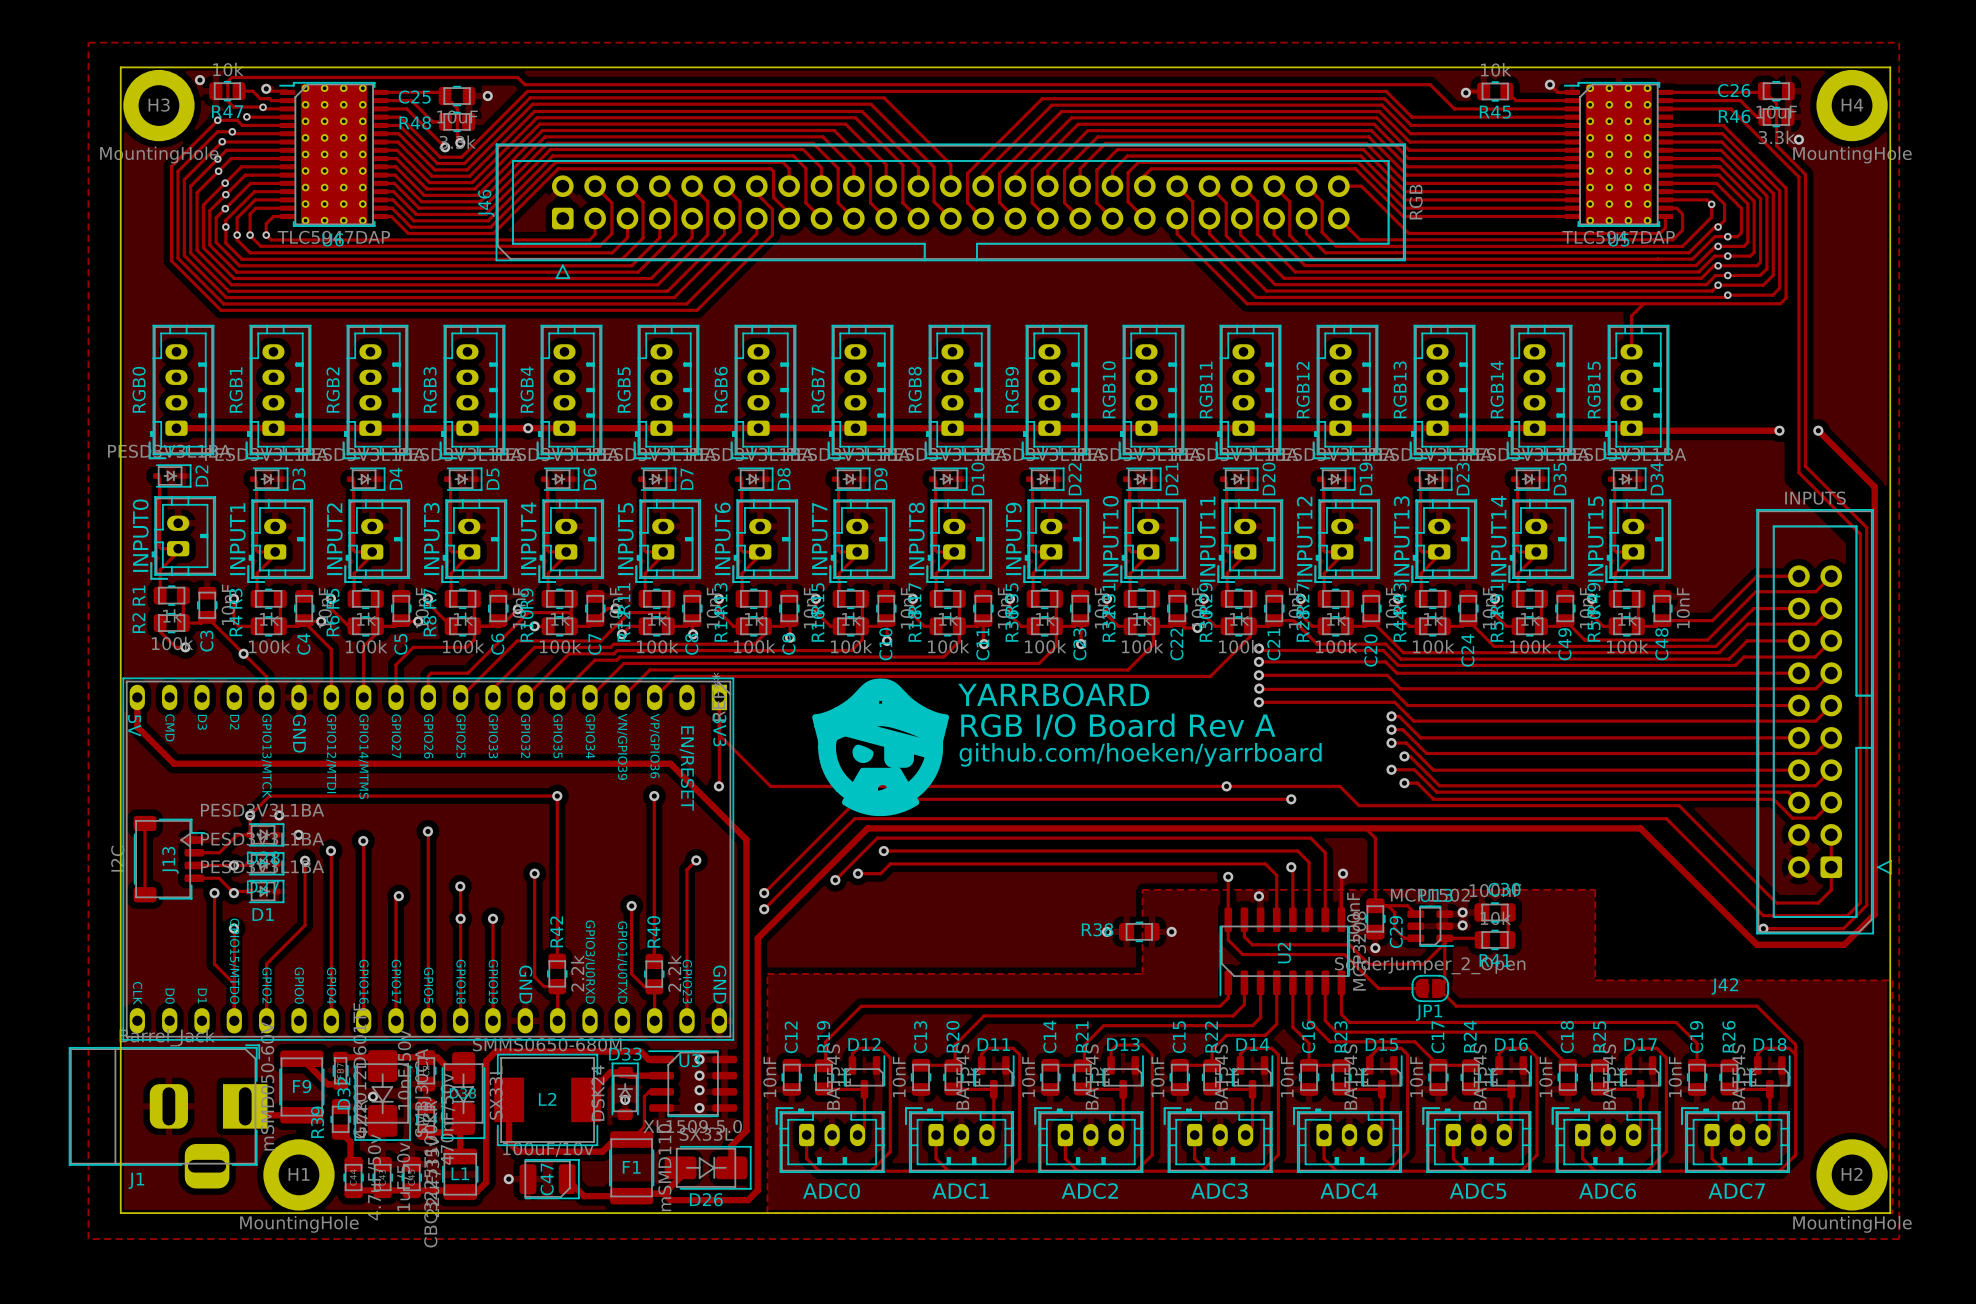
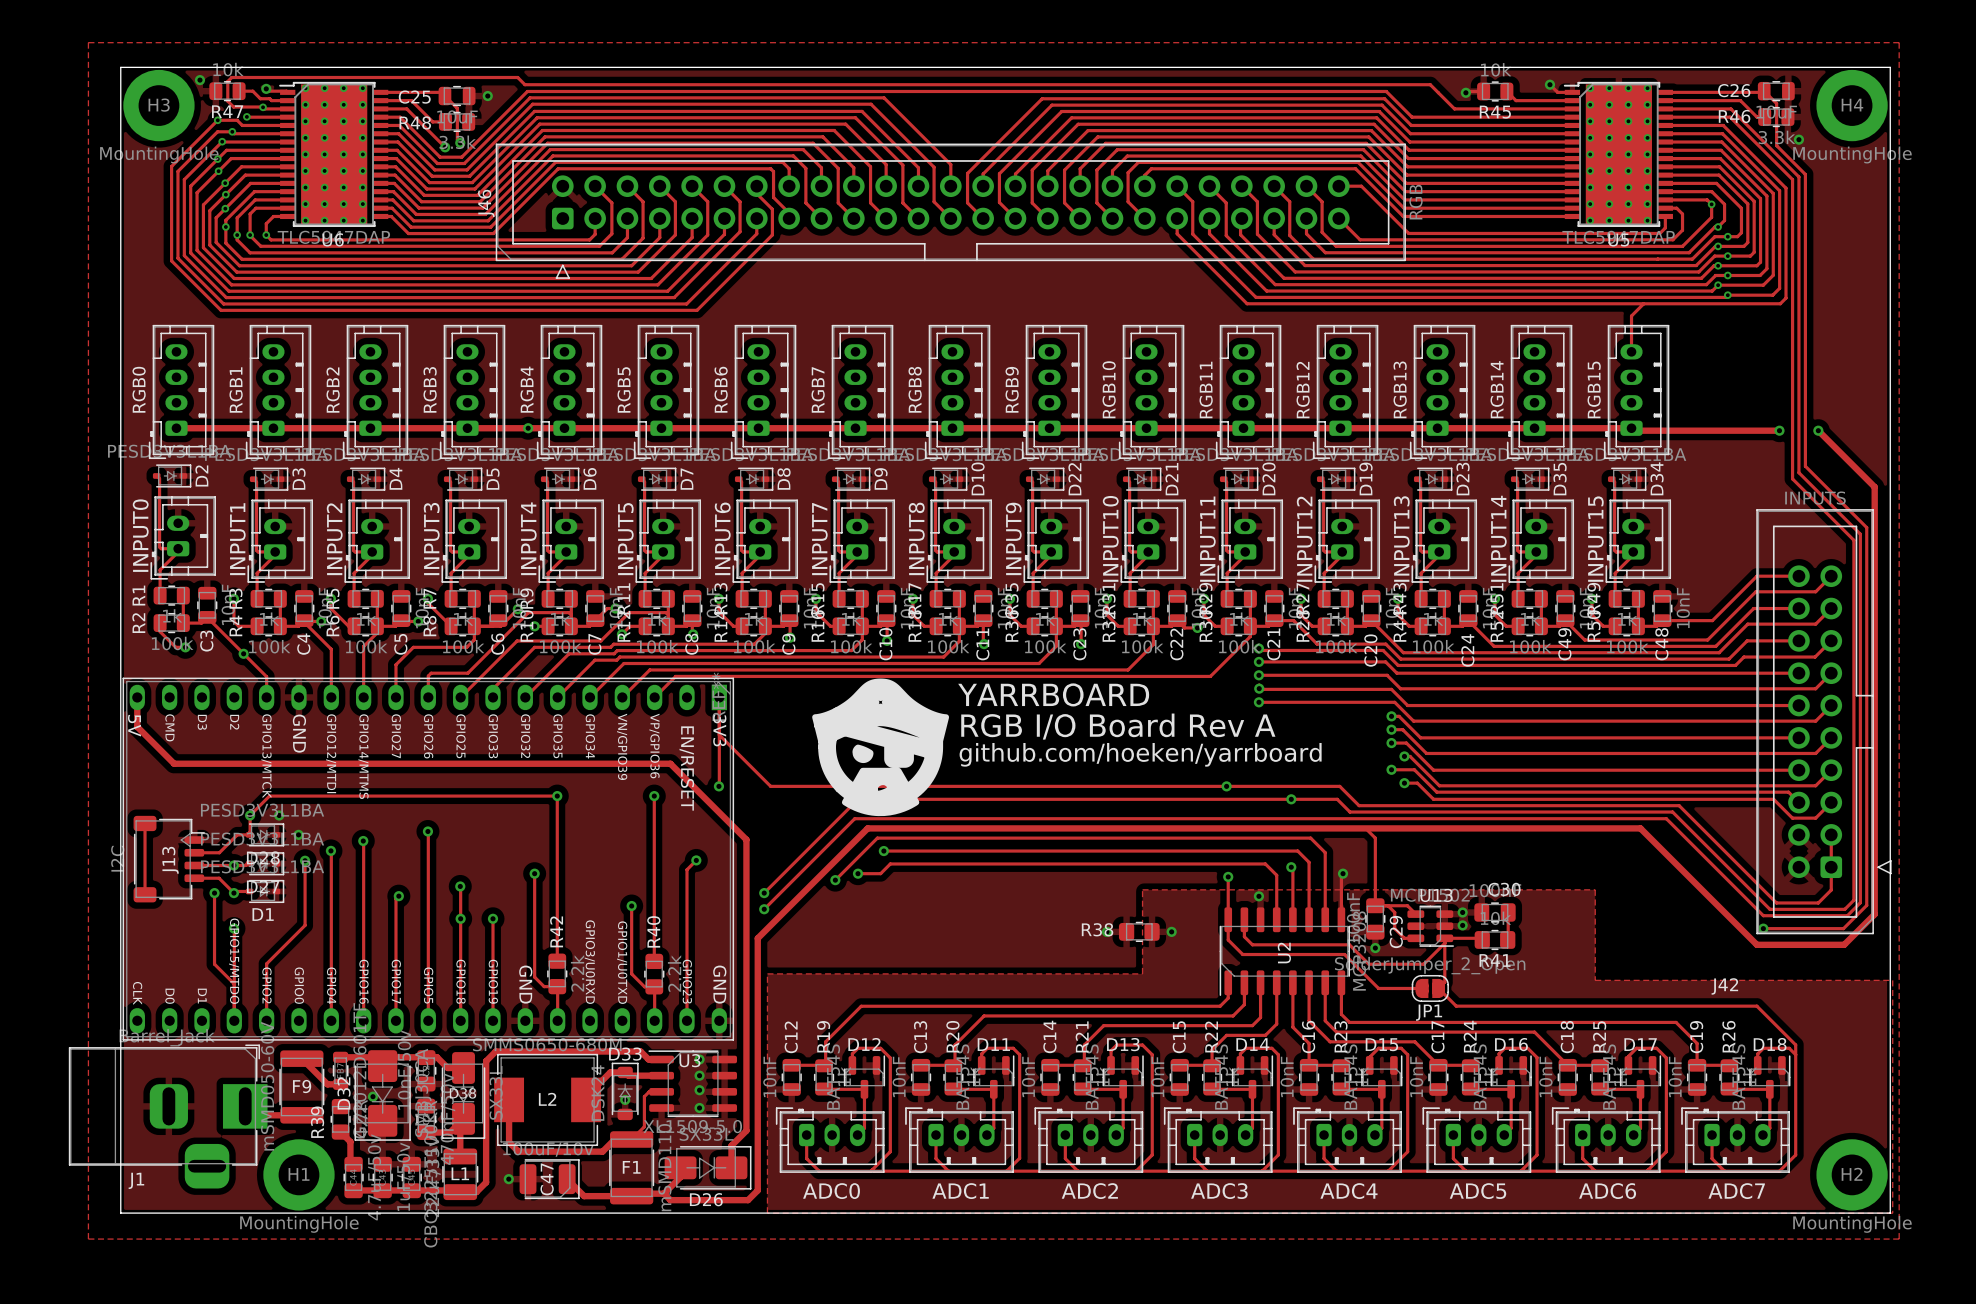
track: none -> (1665, 117) (1730, 117) (1792, 179) (1792, 478) (1853, 540) (1853, 900) (1844, 909) (1769, 909) (1672, 812) (1349, 812) (1337, 799) (1291, 799)

